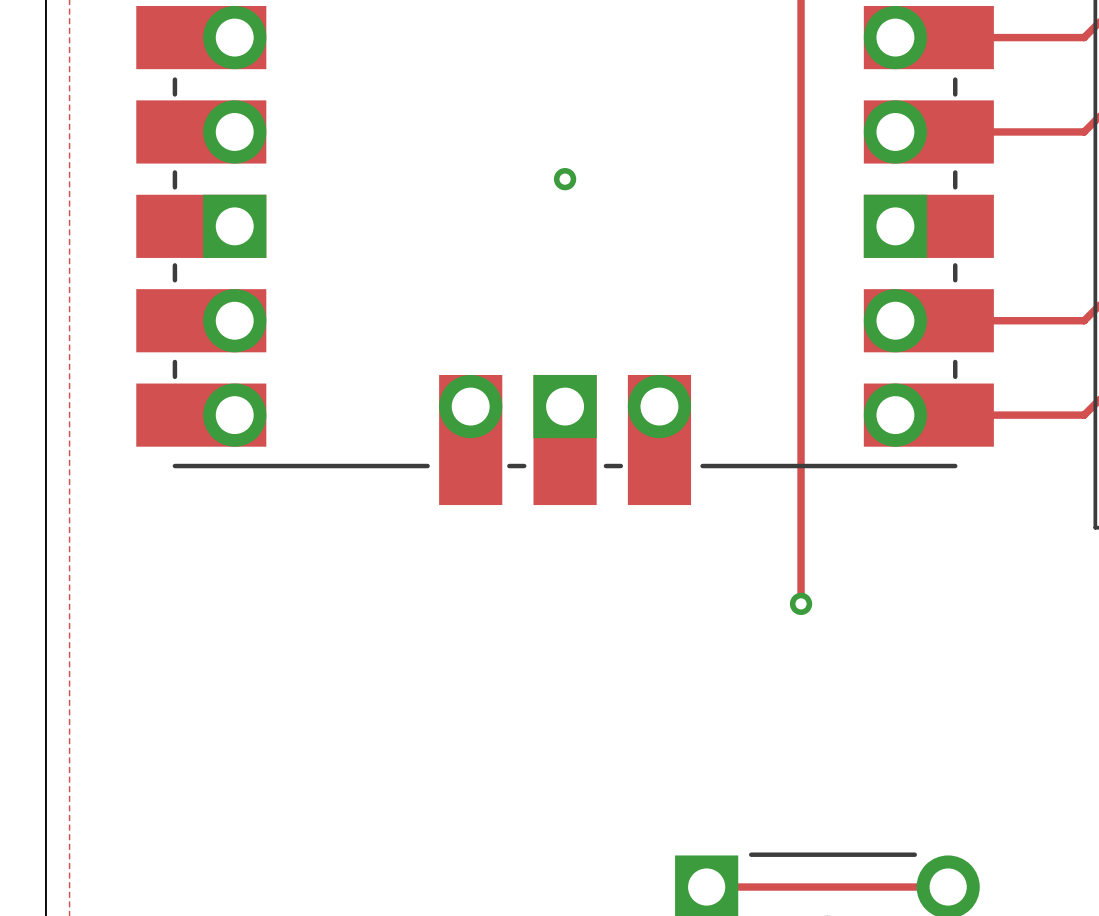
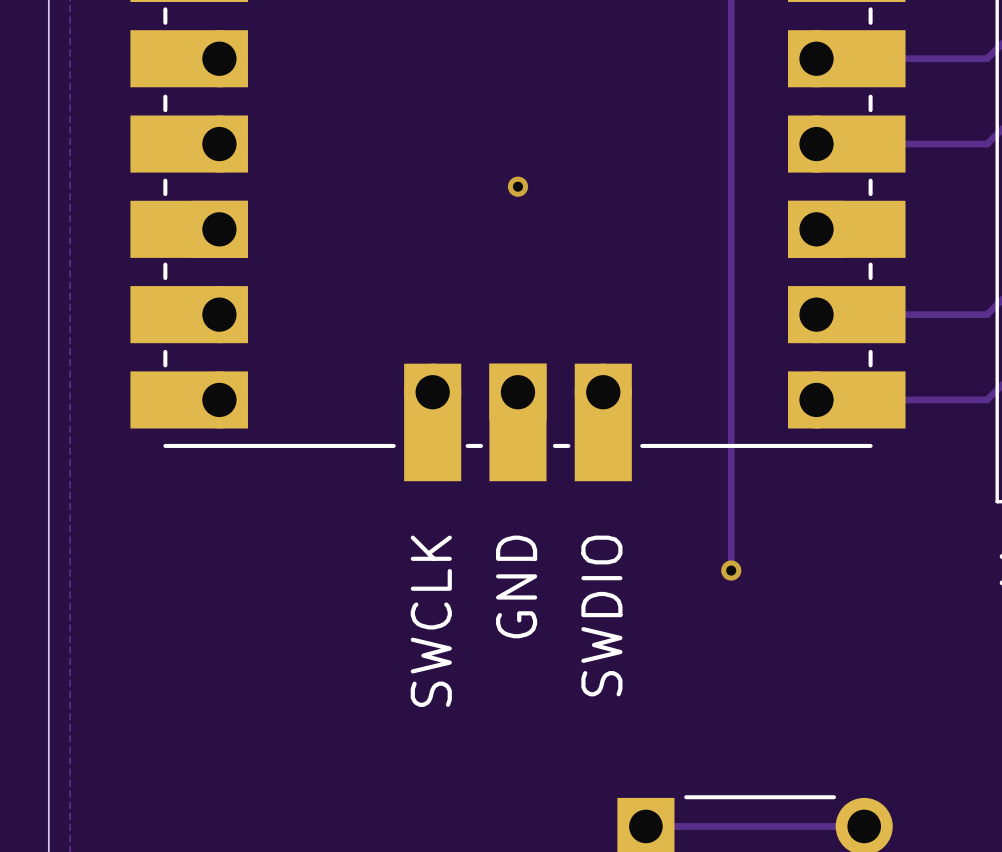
part text: none -> GND (516, 586)
part text: none -> SWCLK (431, 621)
part text: none -> SWDIO (601, 615)

